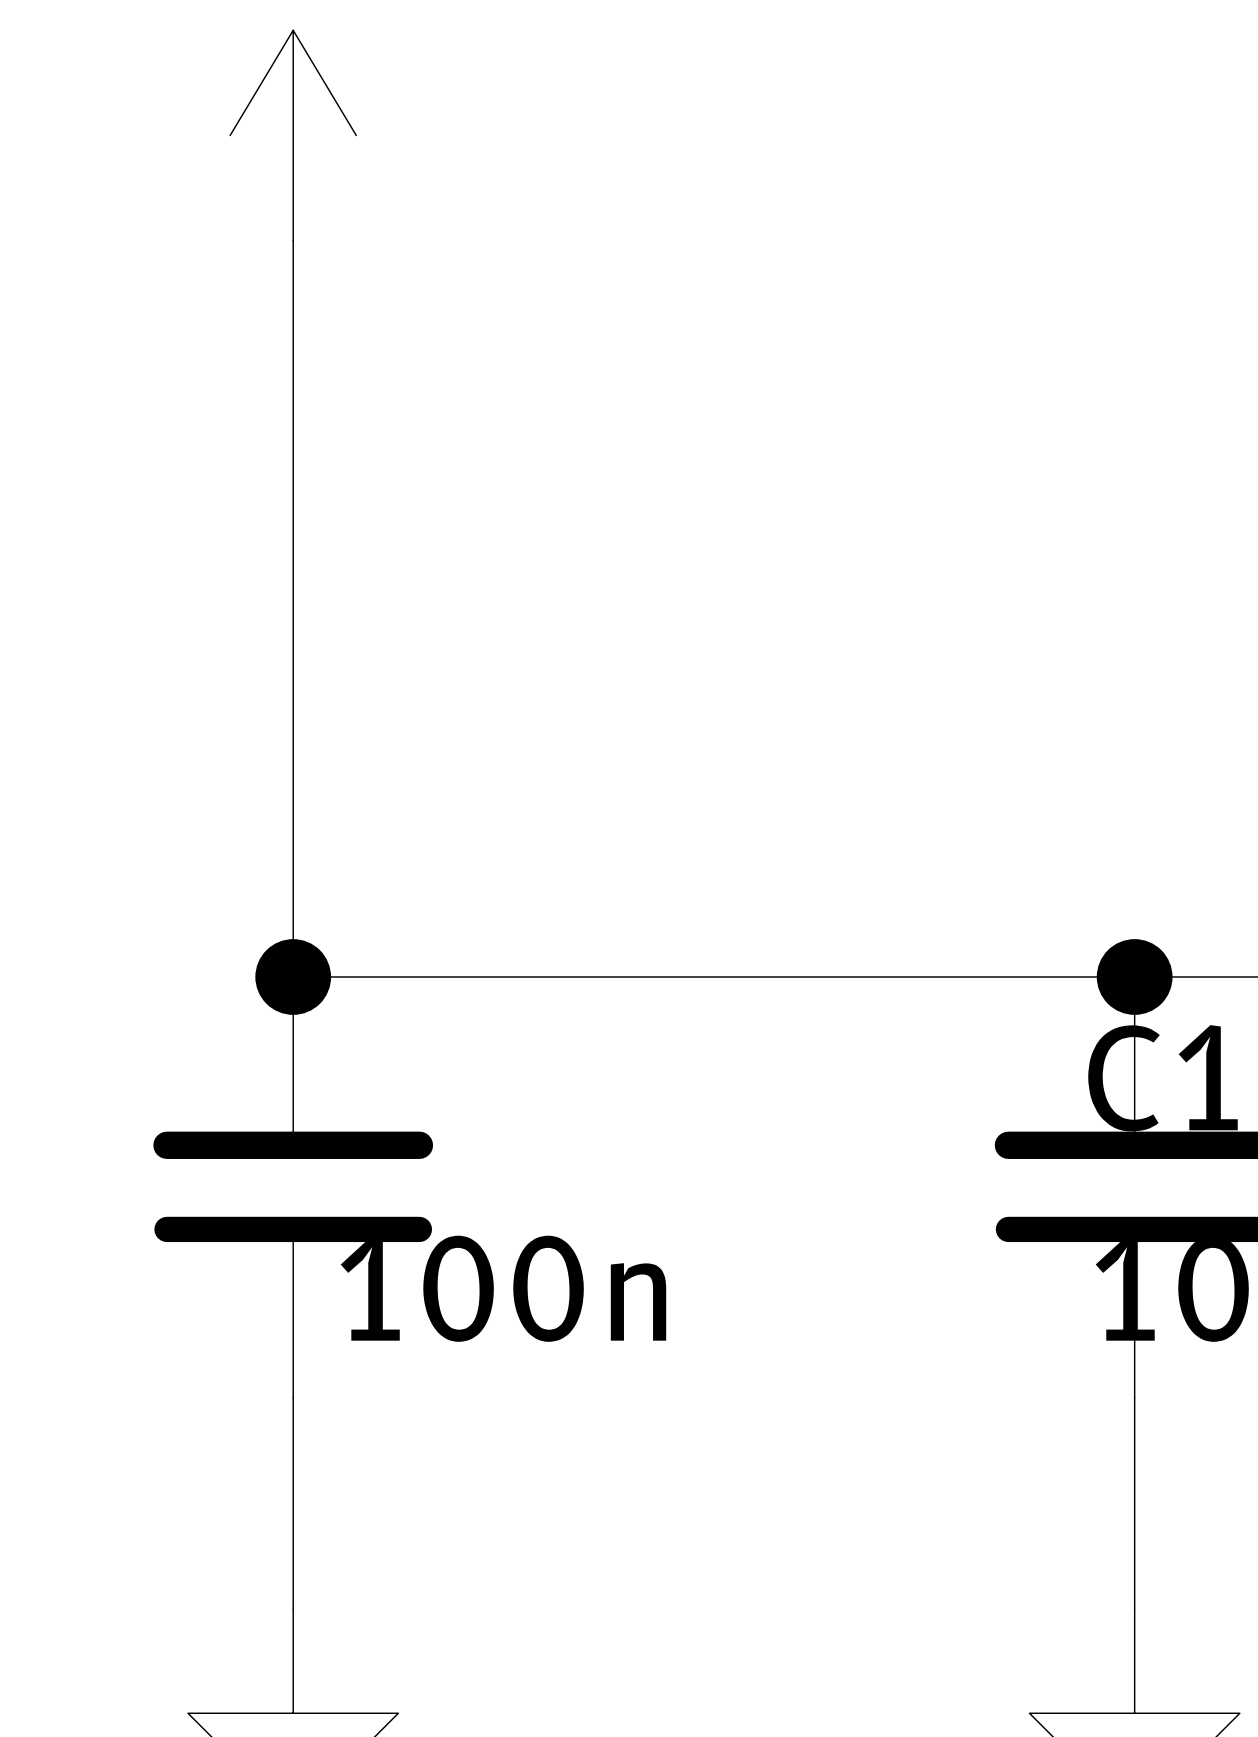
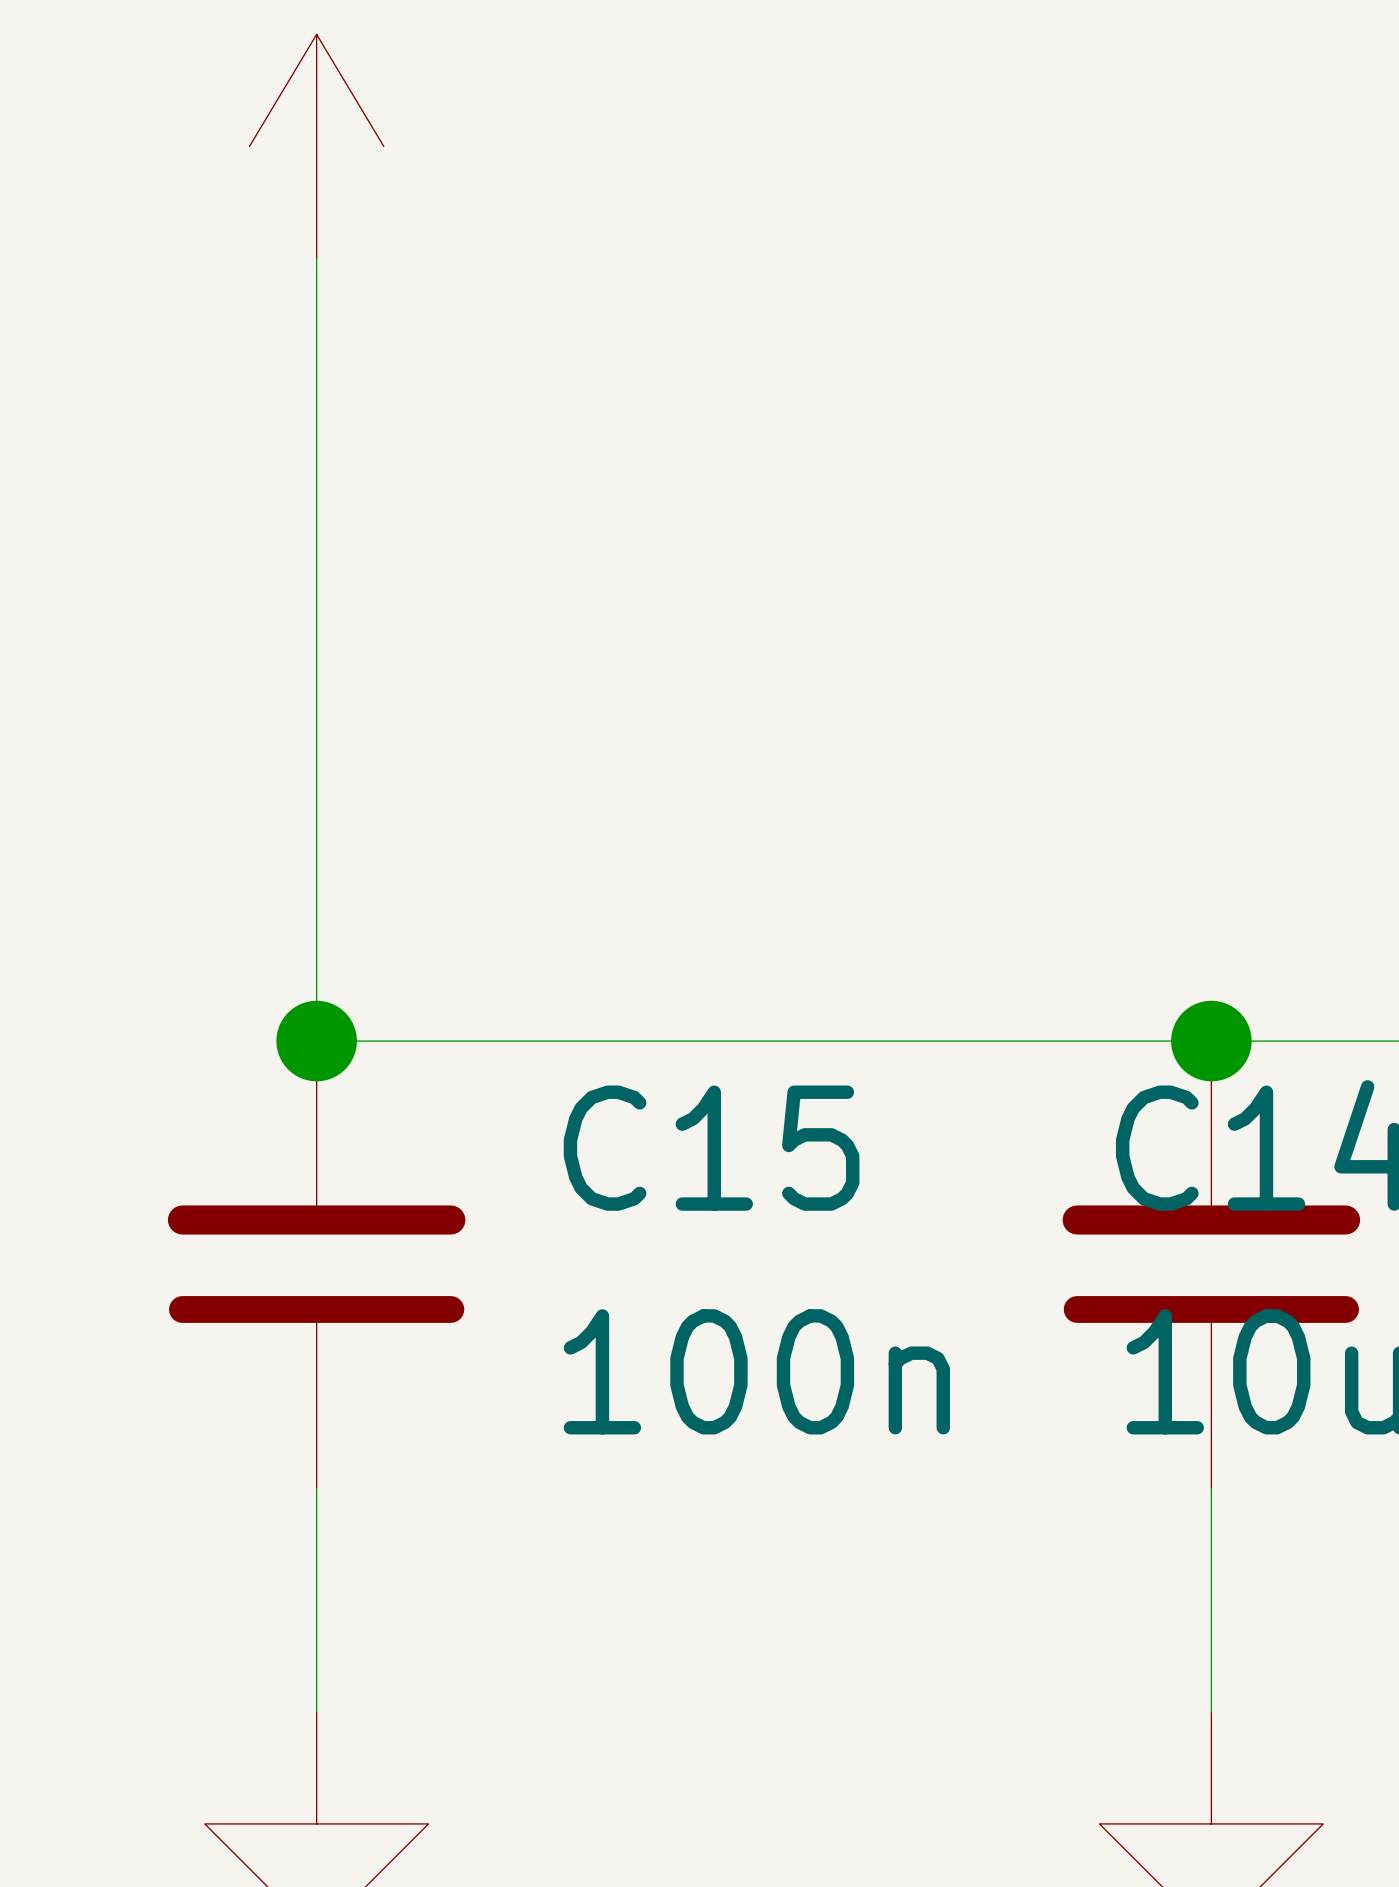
C15 name: none -> C15 (711, 1148)
C15 value position: 100n (503, 1288) -> 100n (756, 1371)

